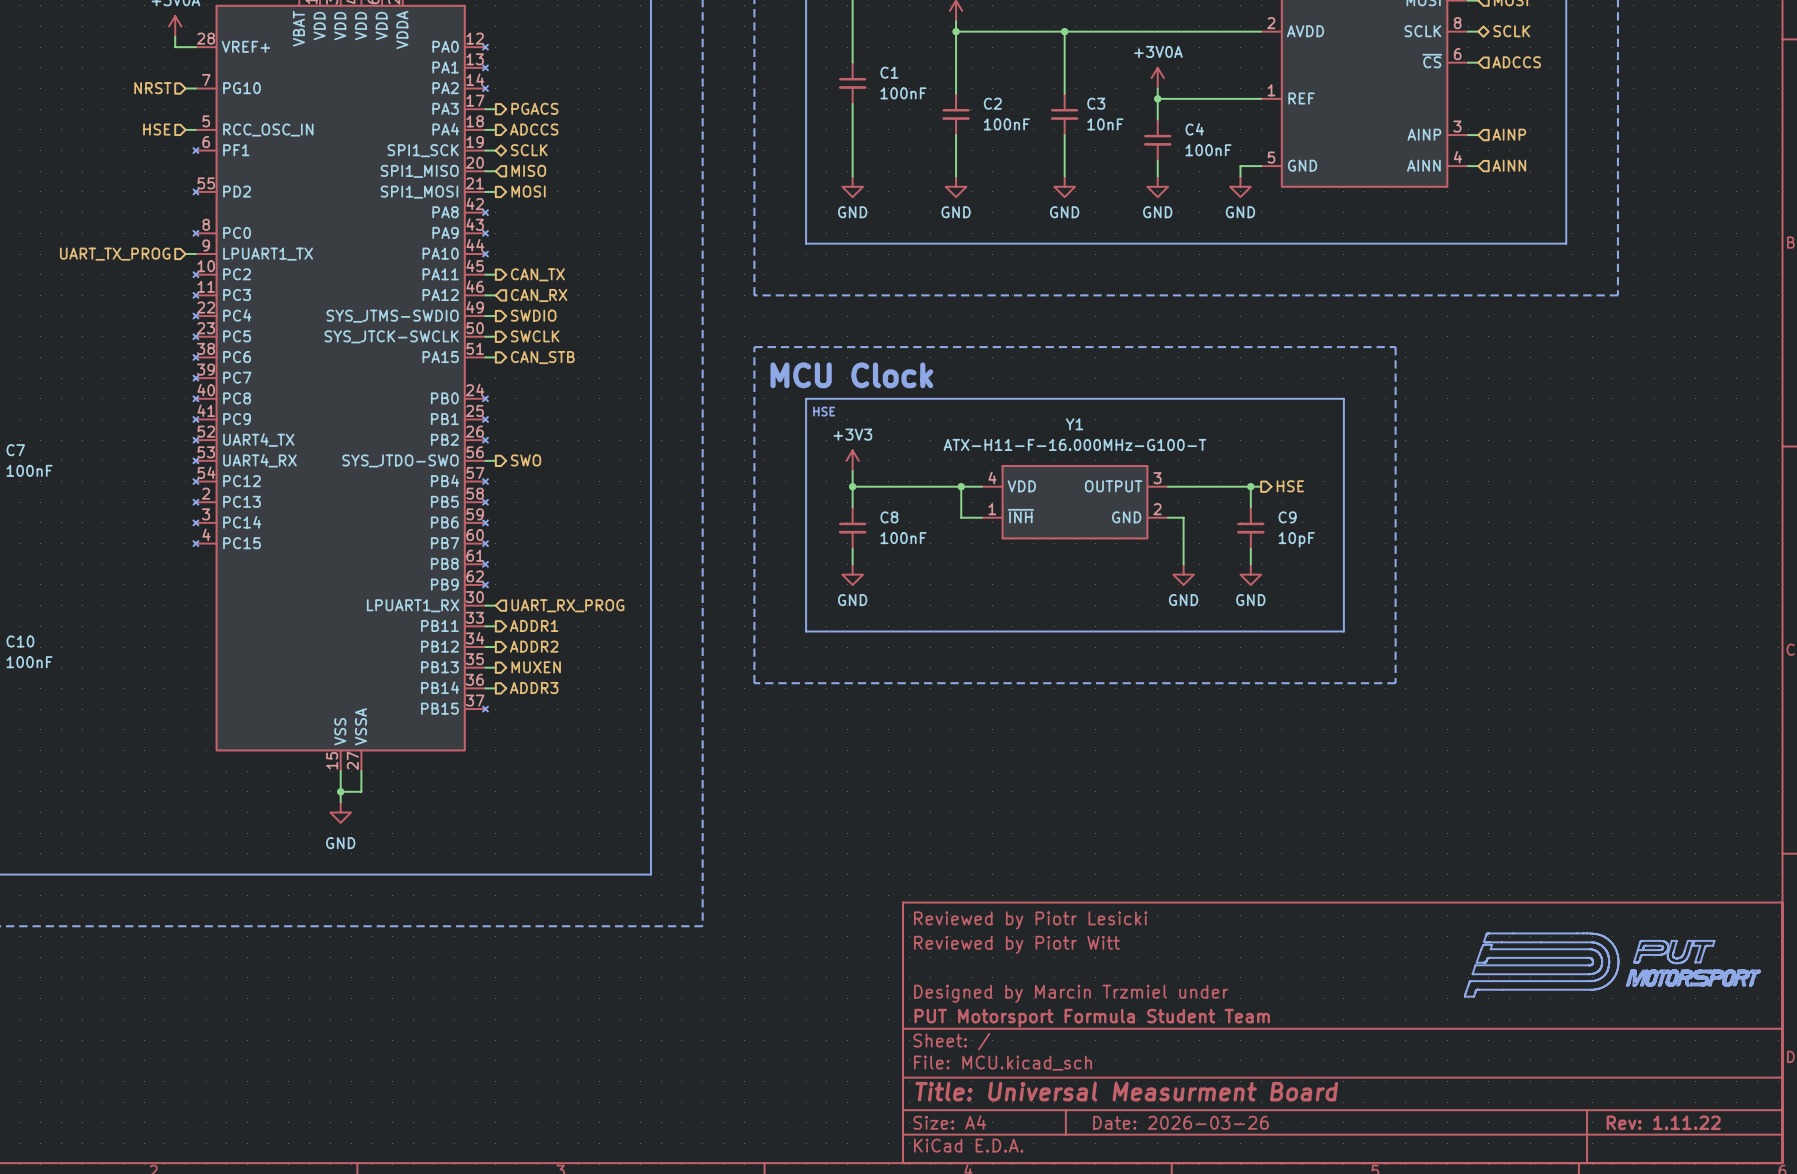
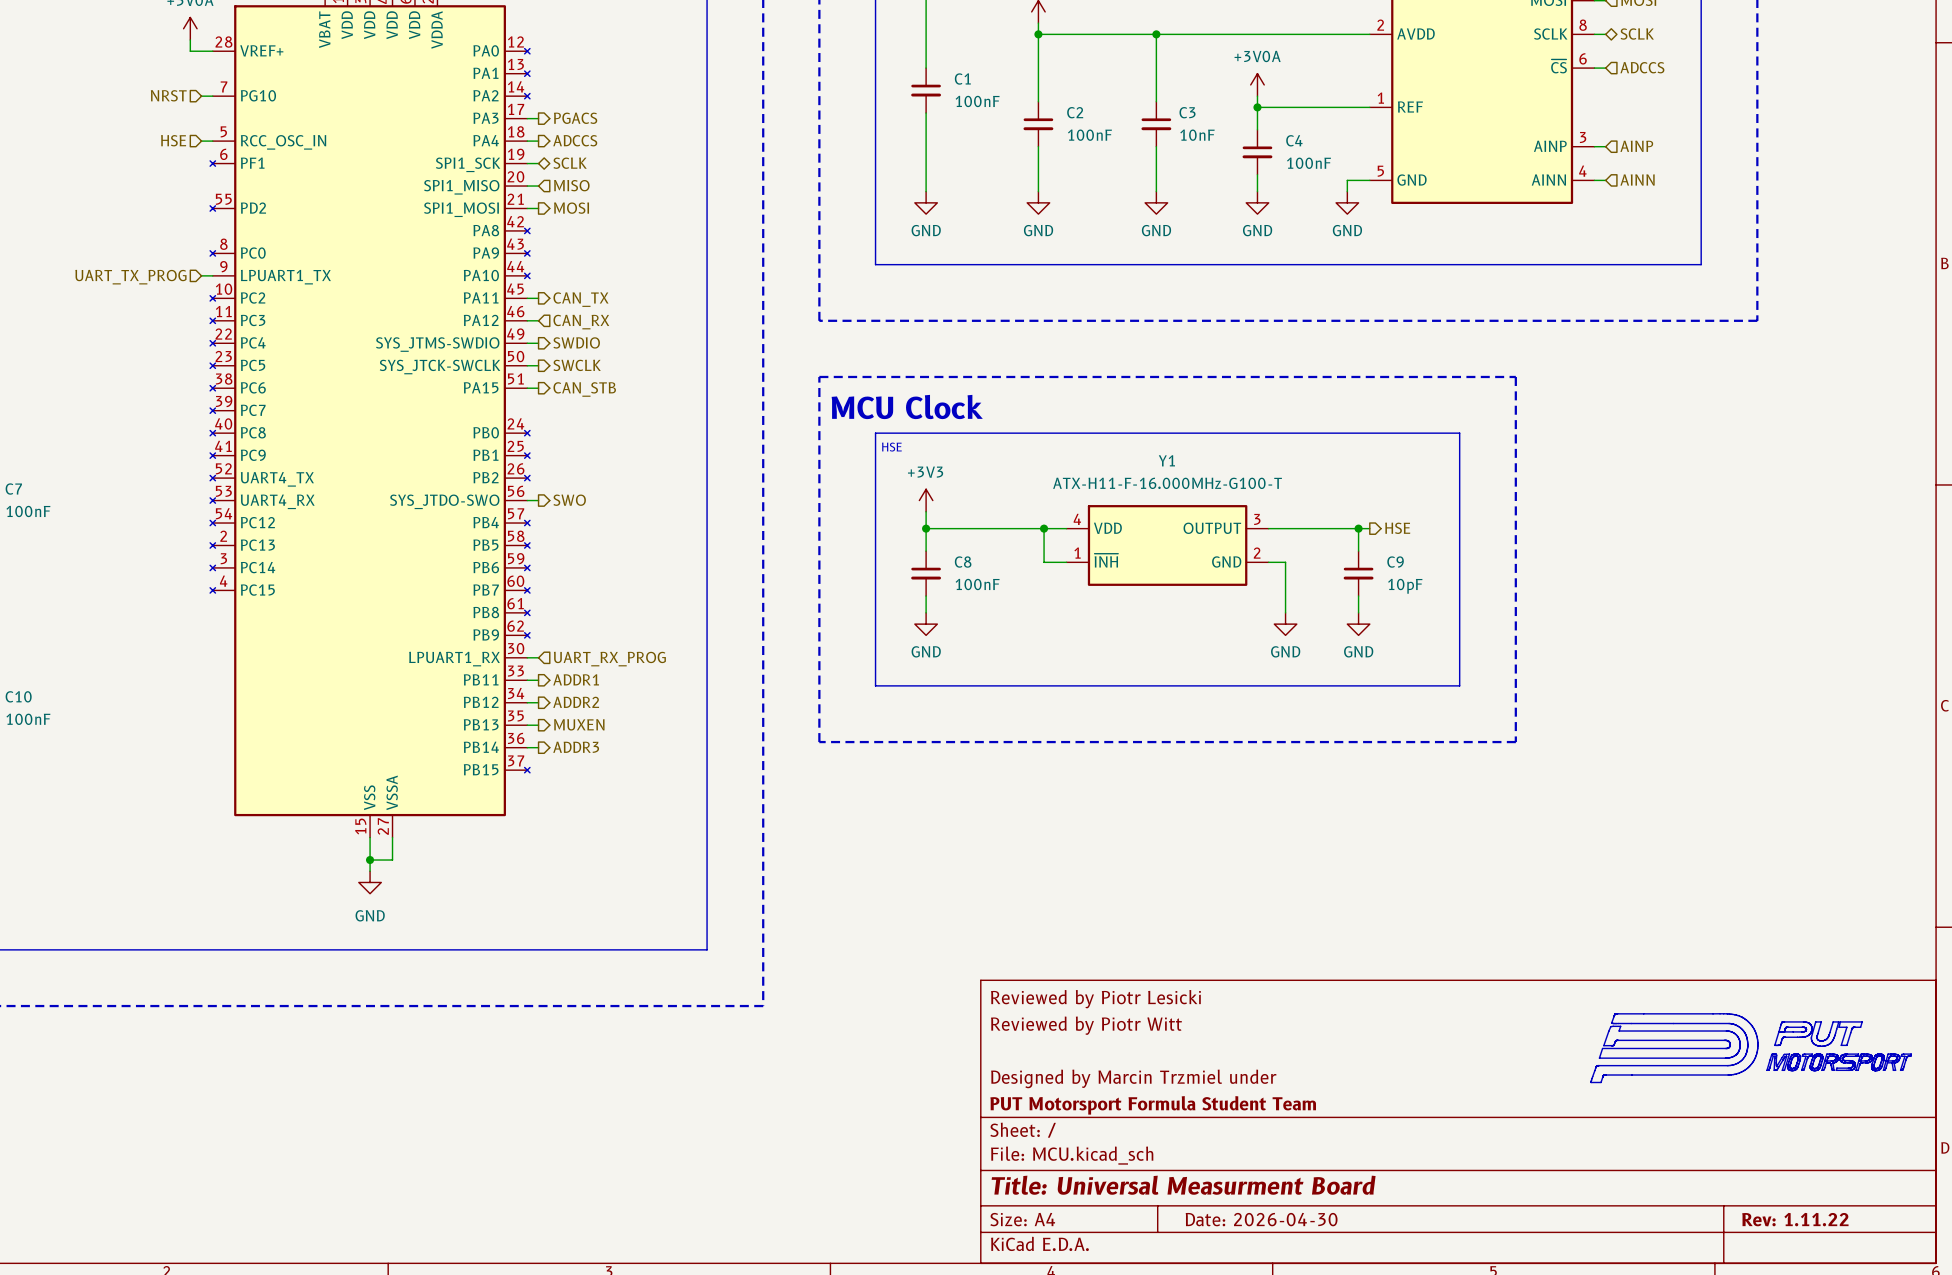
title block: Date: 2026-03-26 (1180, 1122) -> Date: 2026-04-30 (1261, 1219)

